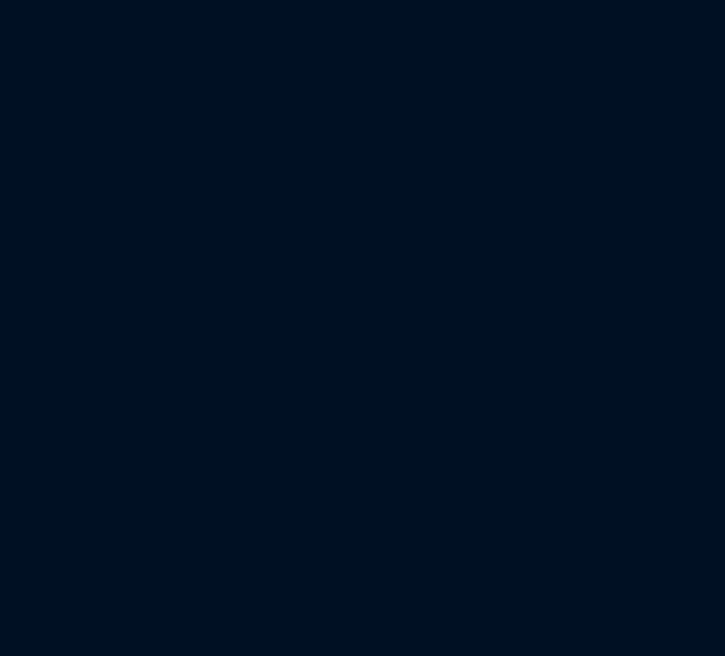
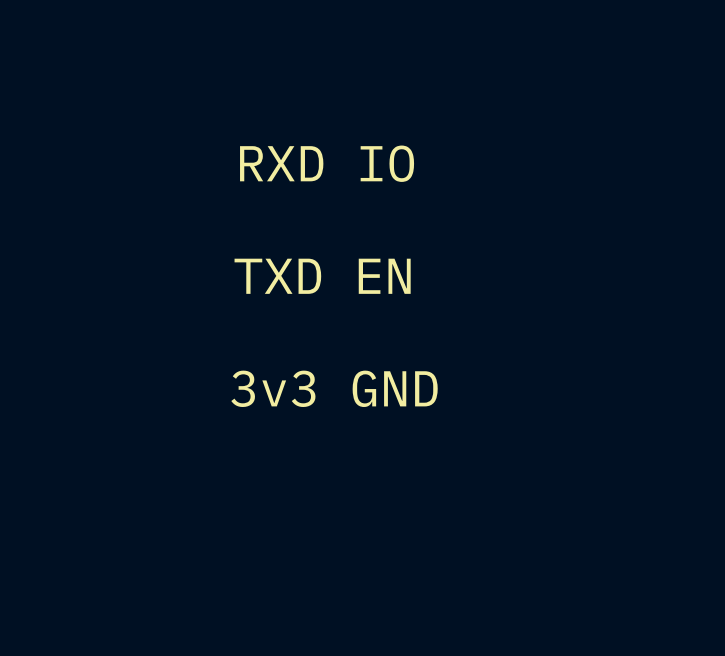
text: none -> RXD IO (327, 163)
text: none -> TXD EN (322, 276)
text: none -> 3v3 GND (334, 388)

